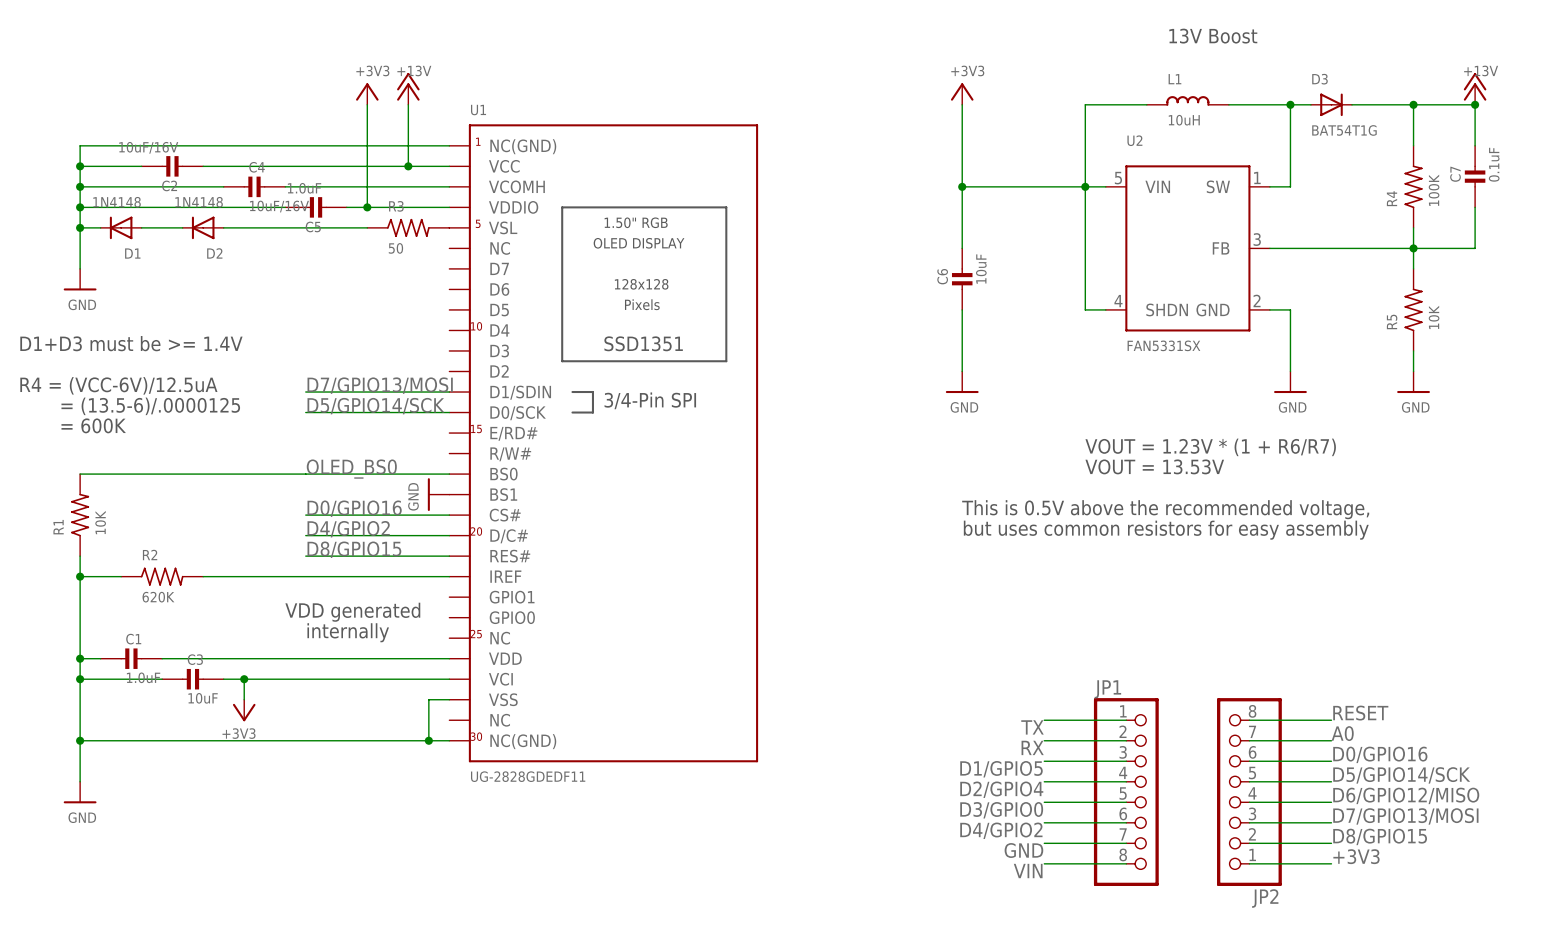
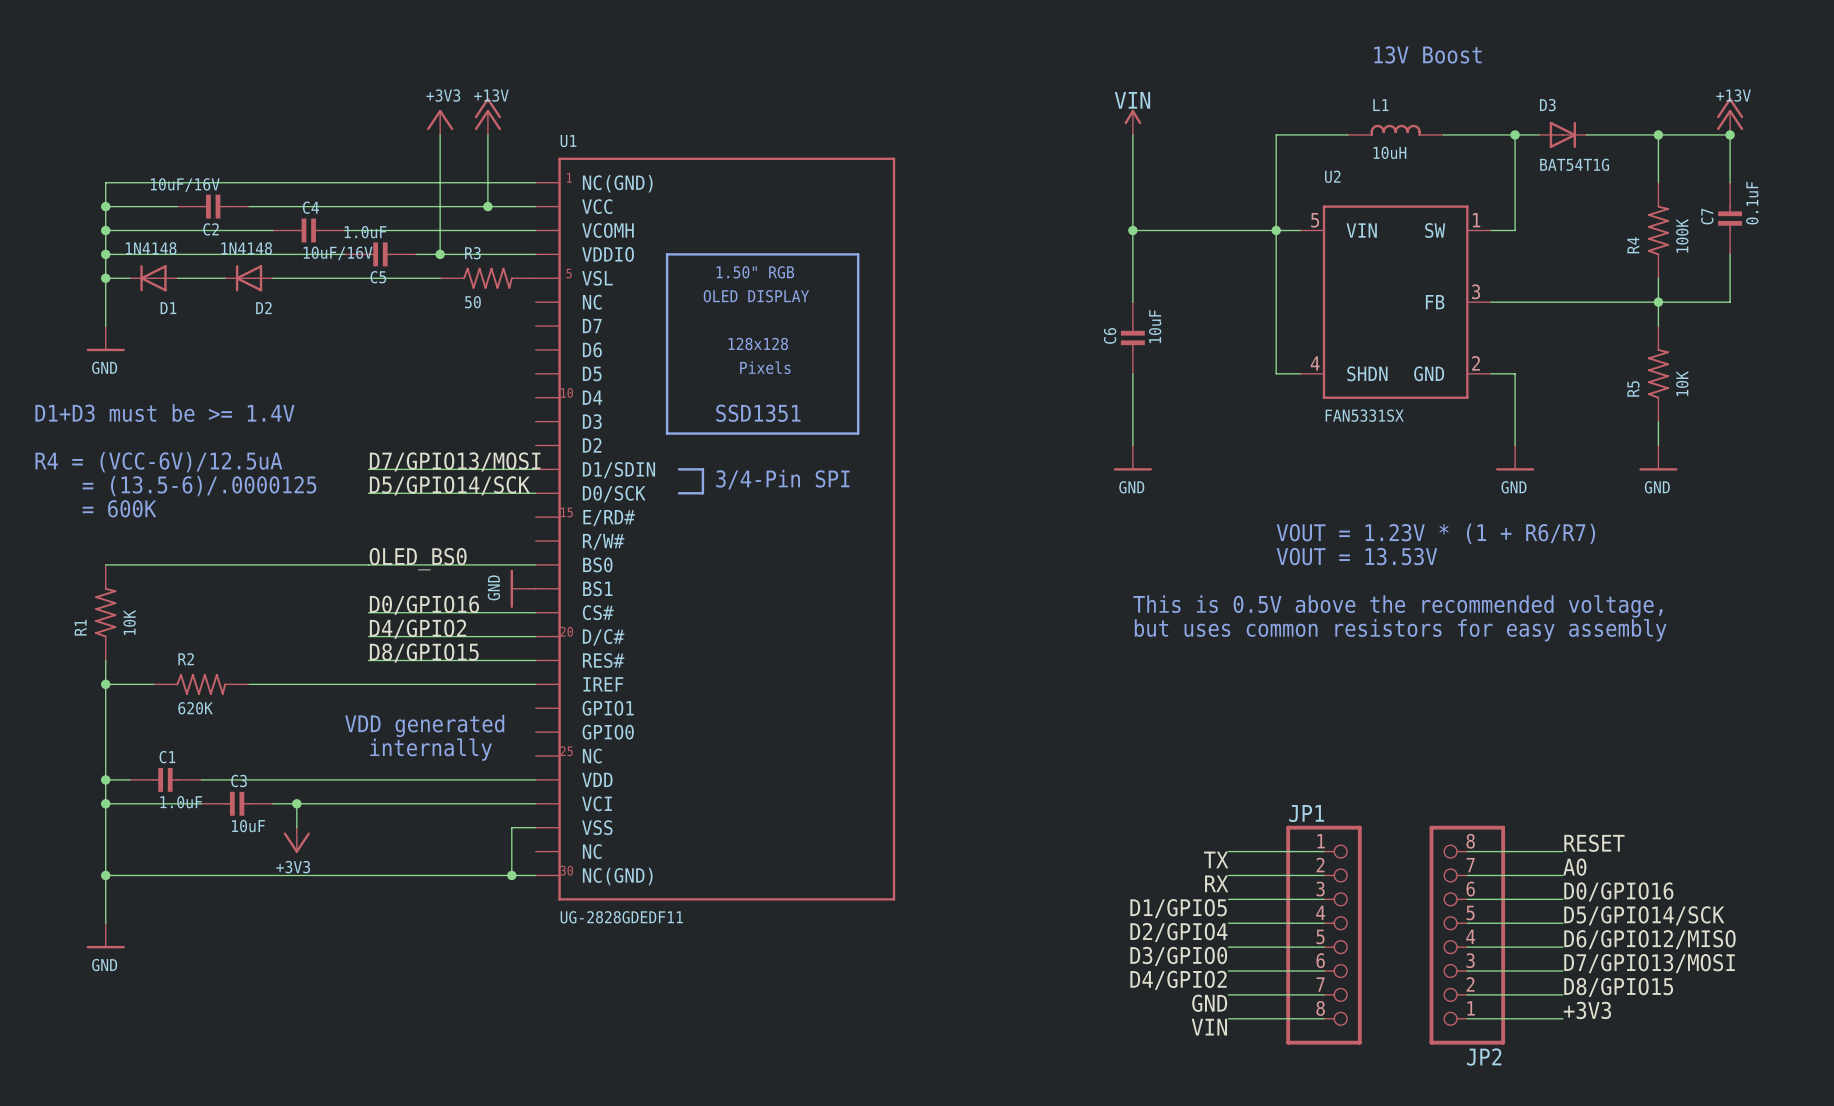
power symbol: +3V3 (962, 94) -> VIN (1132, 122)

